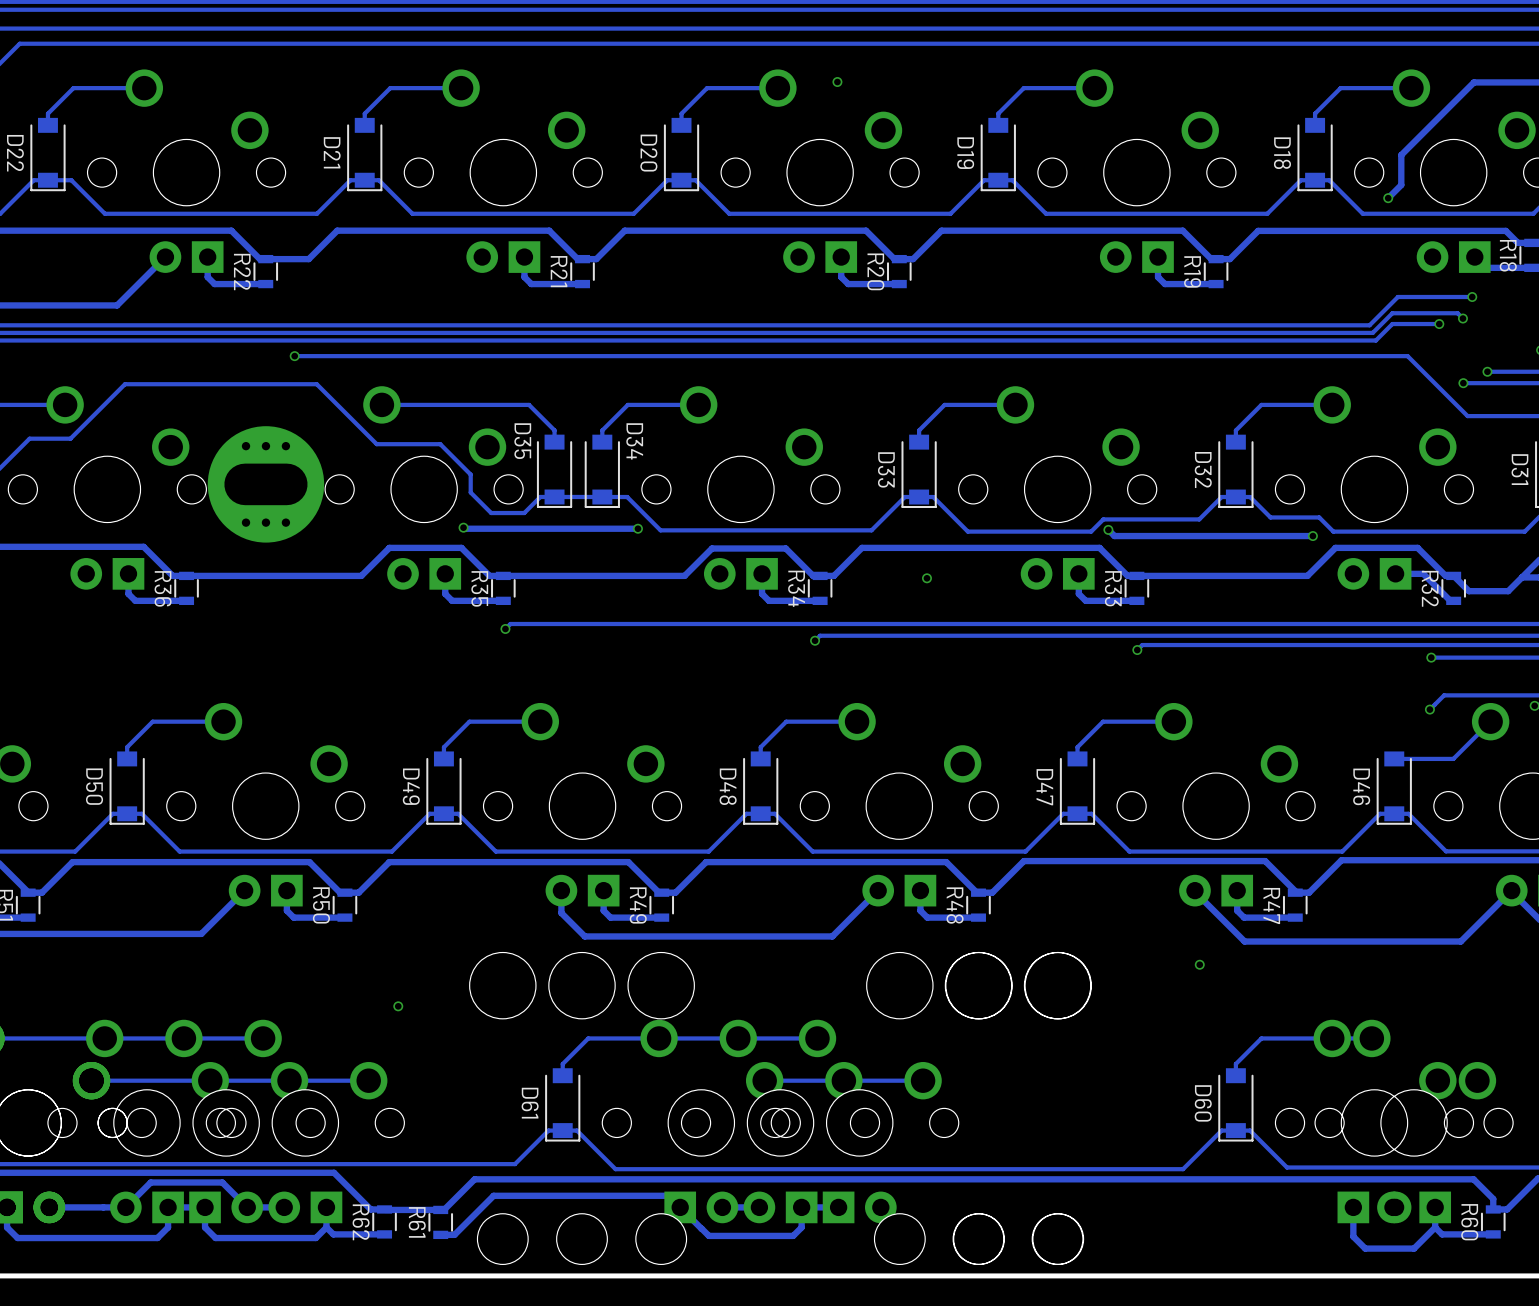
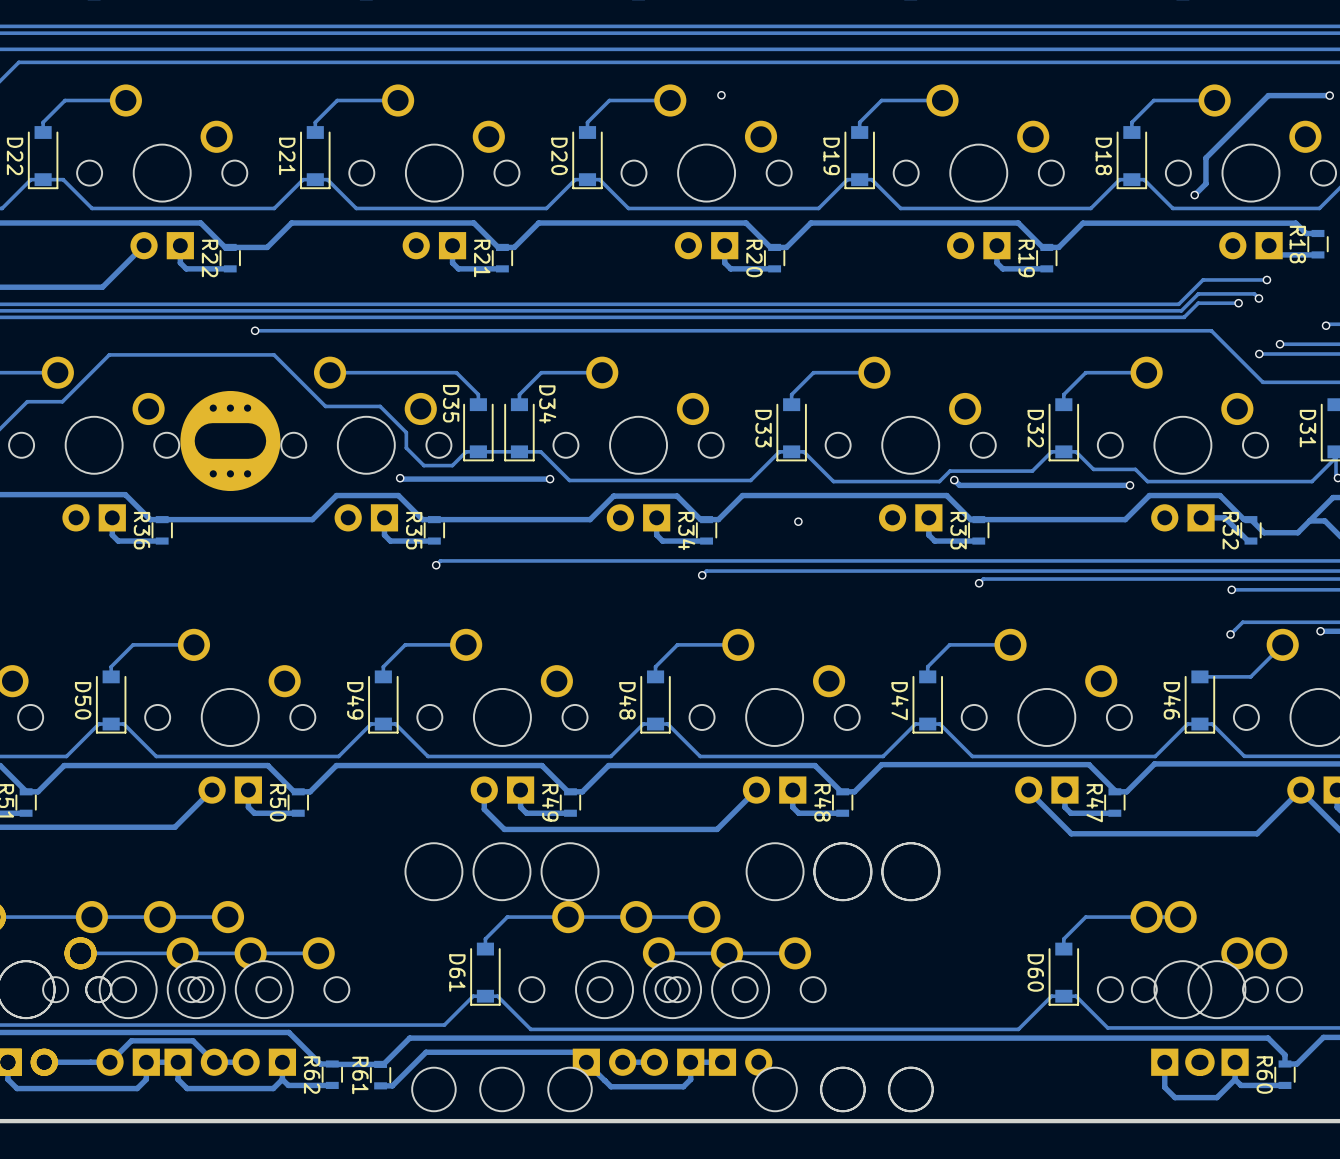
via: (1199, 964) -> none
via: (398, 1006) -> none

